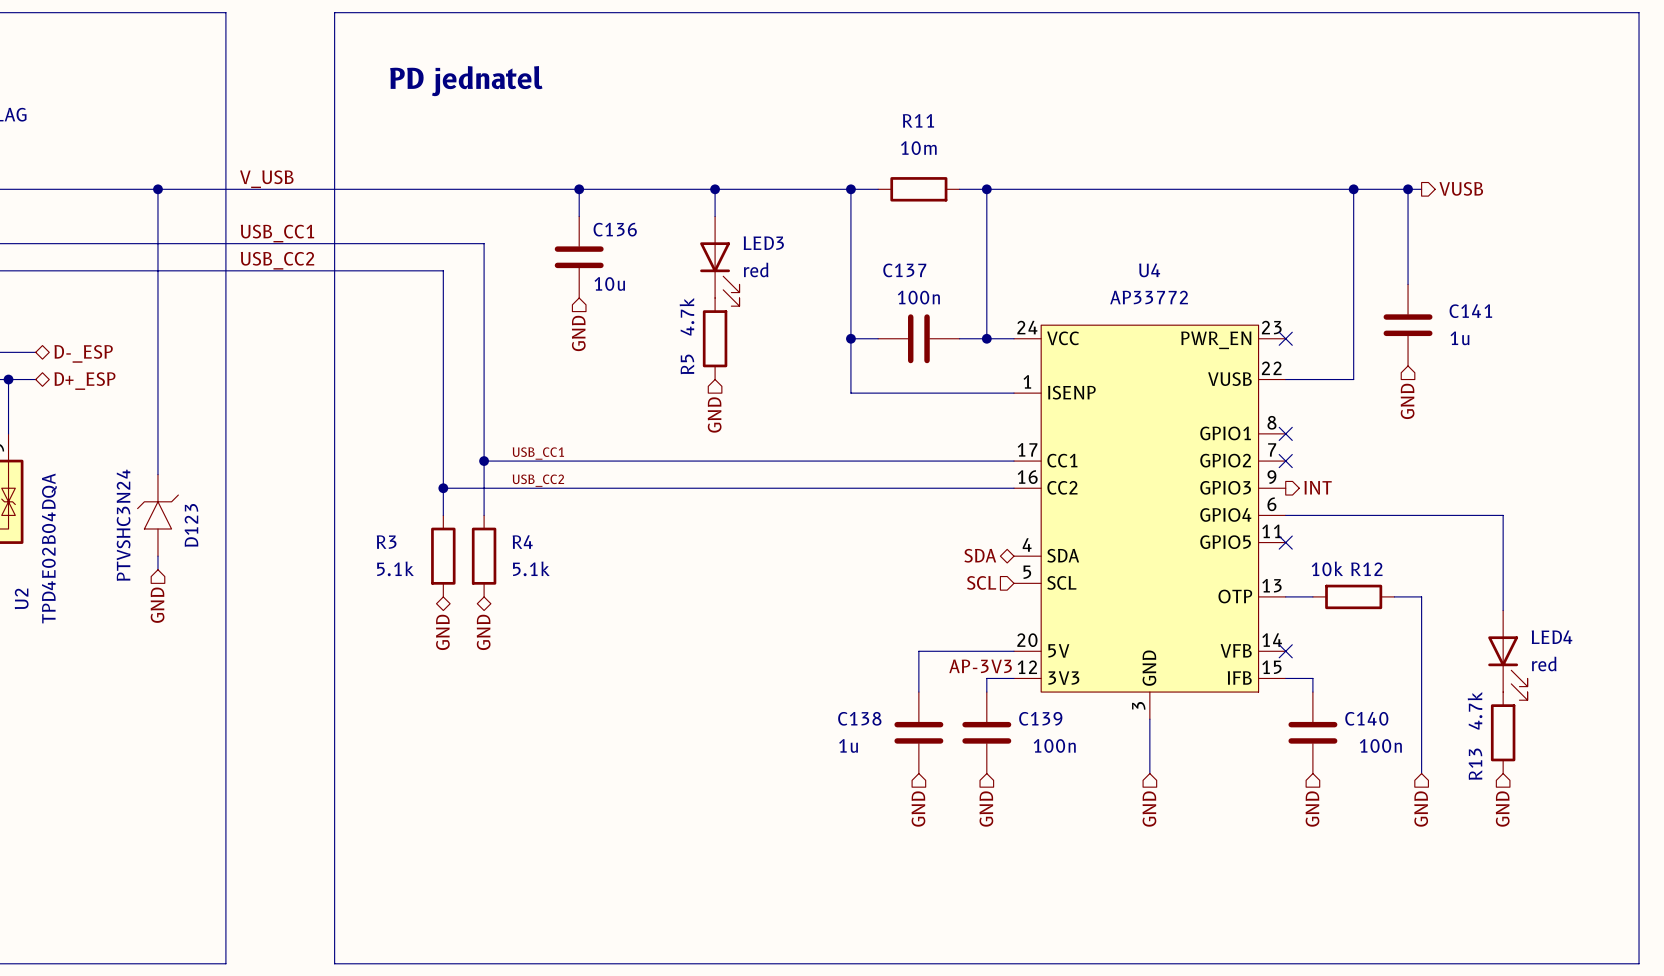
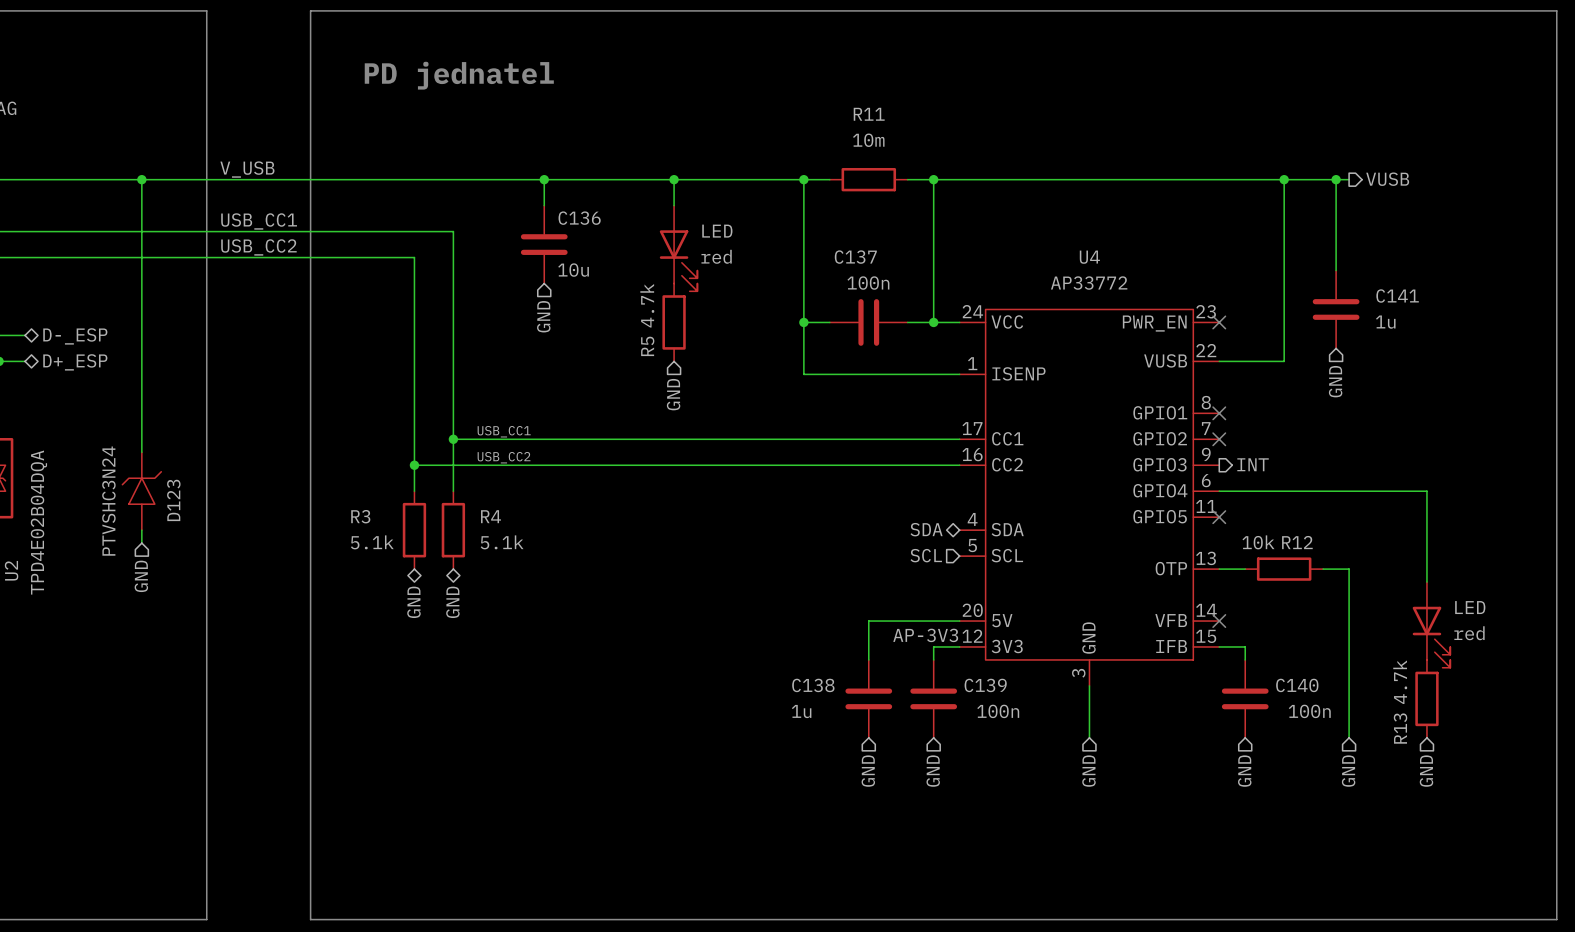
LED3 name: LED3 (763, 243) -> LED (717, 231)
LED4 name: LED4 (1552, 637) -> LED (1470, 607)

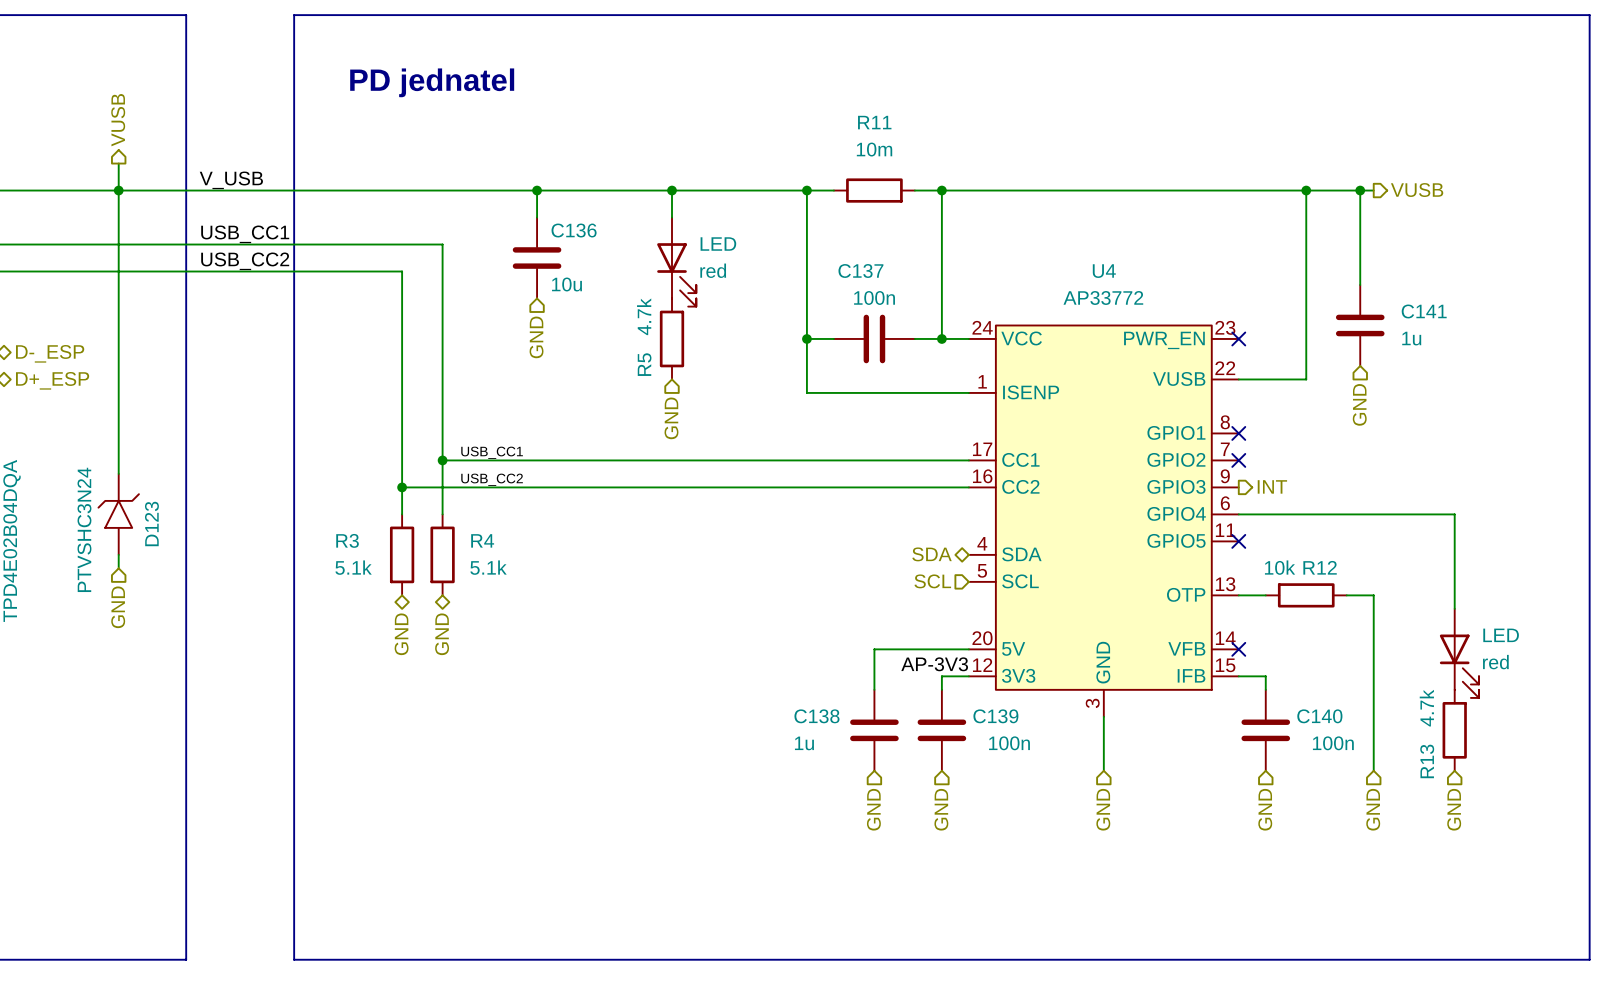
hierarchical label: none -> VUSB (118, 120)
wire: none -> (118, 163) (118, 190)

